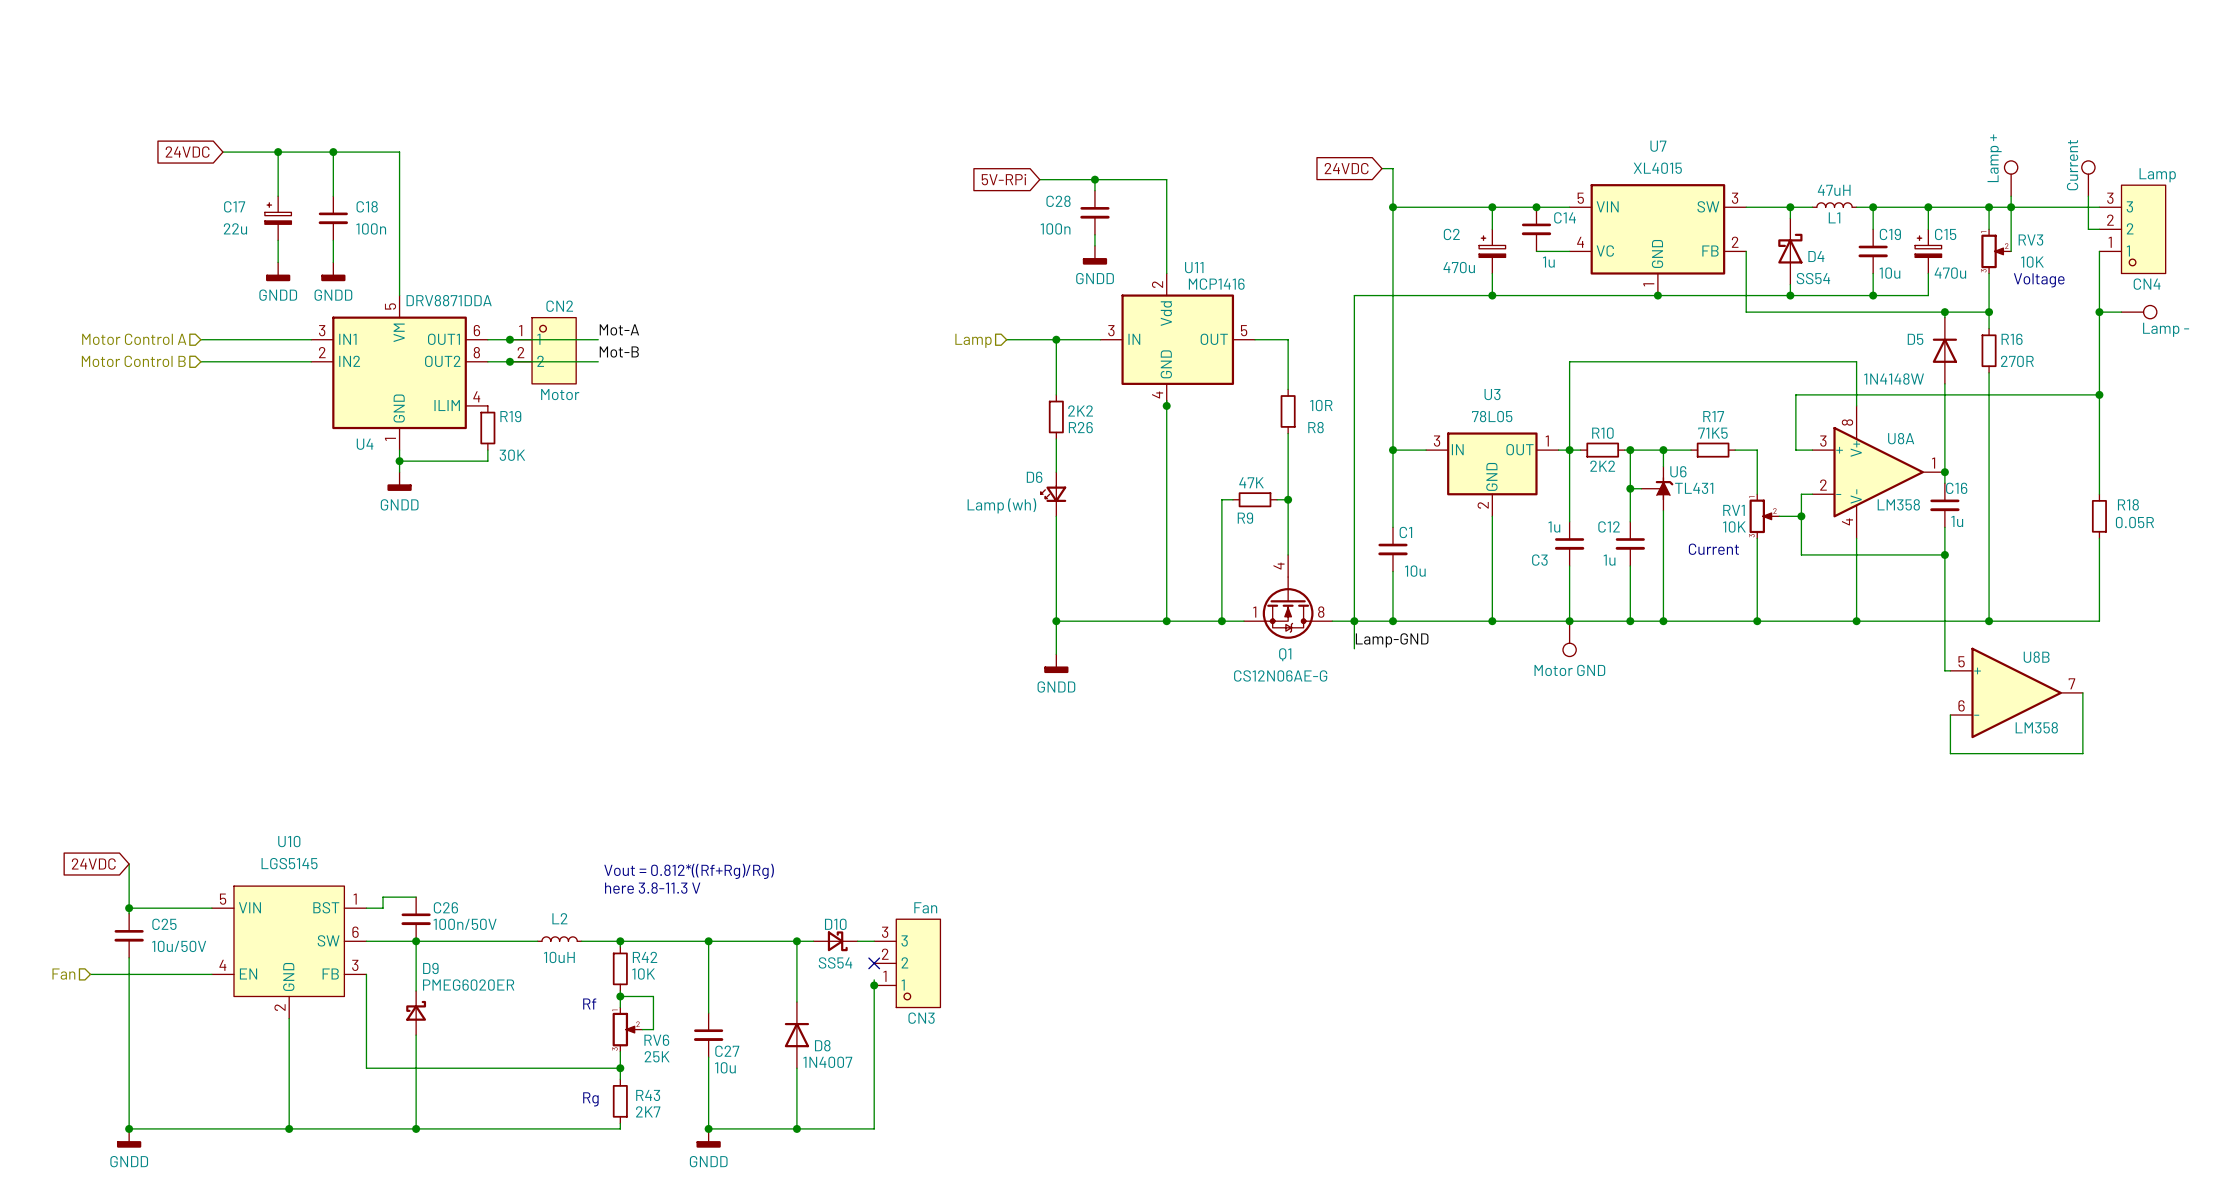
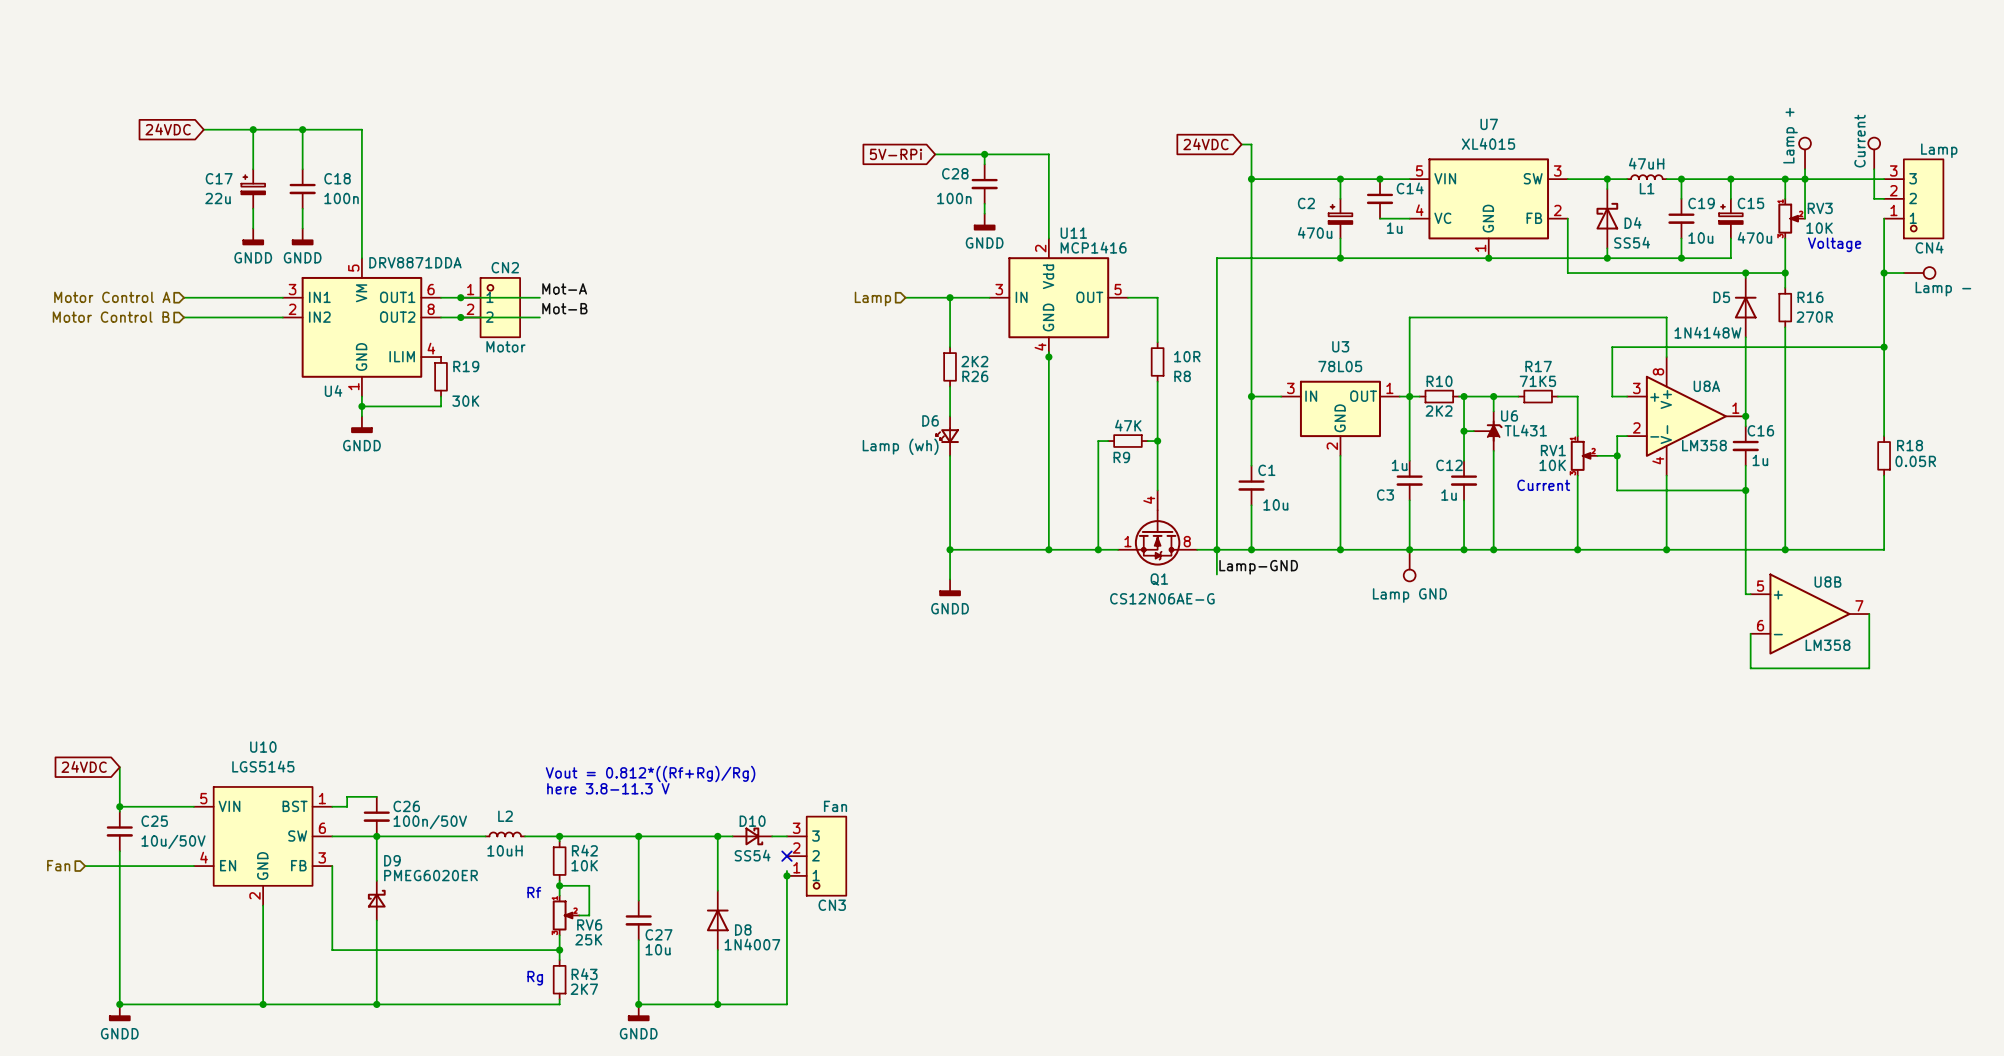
part text: Motor GND (1569, 670) -> Lamp GND (1409, 595)

